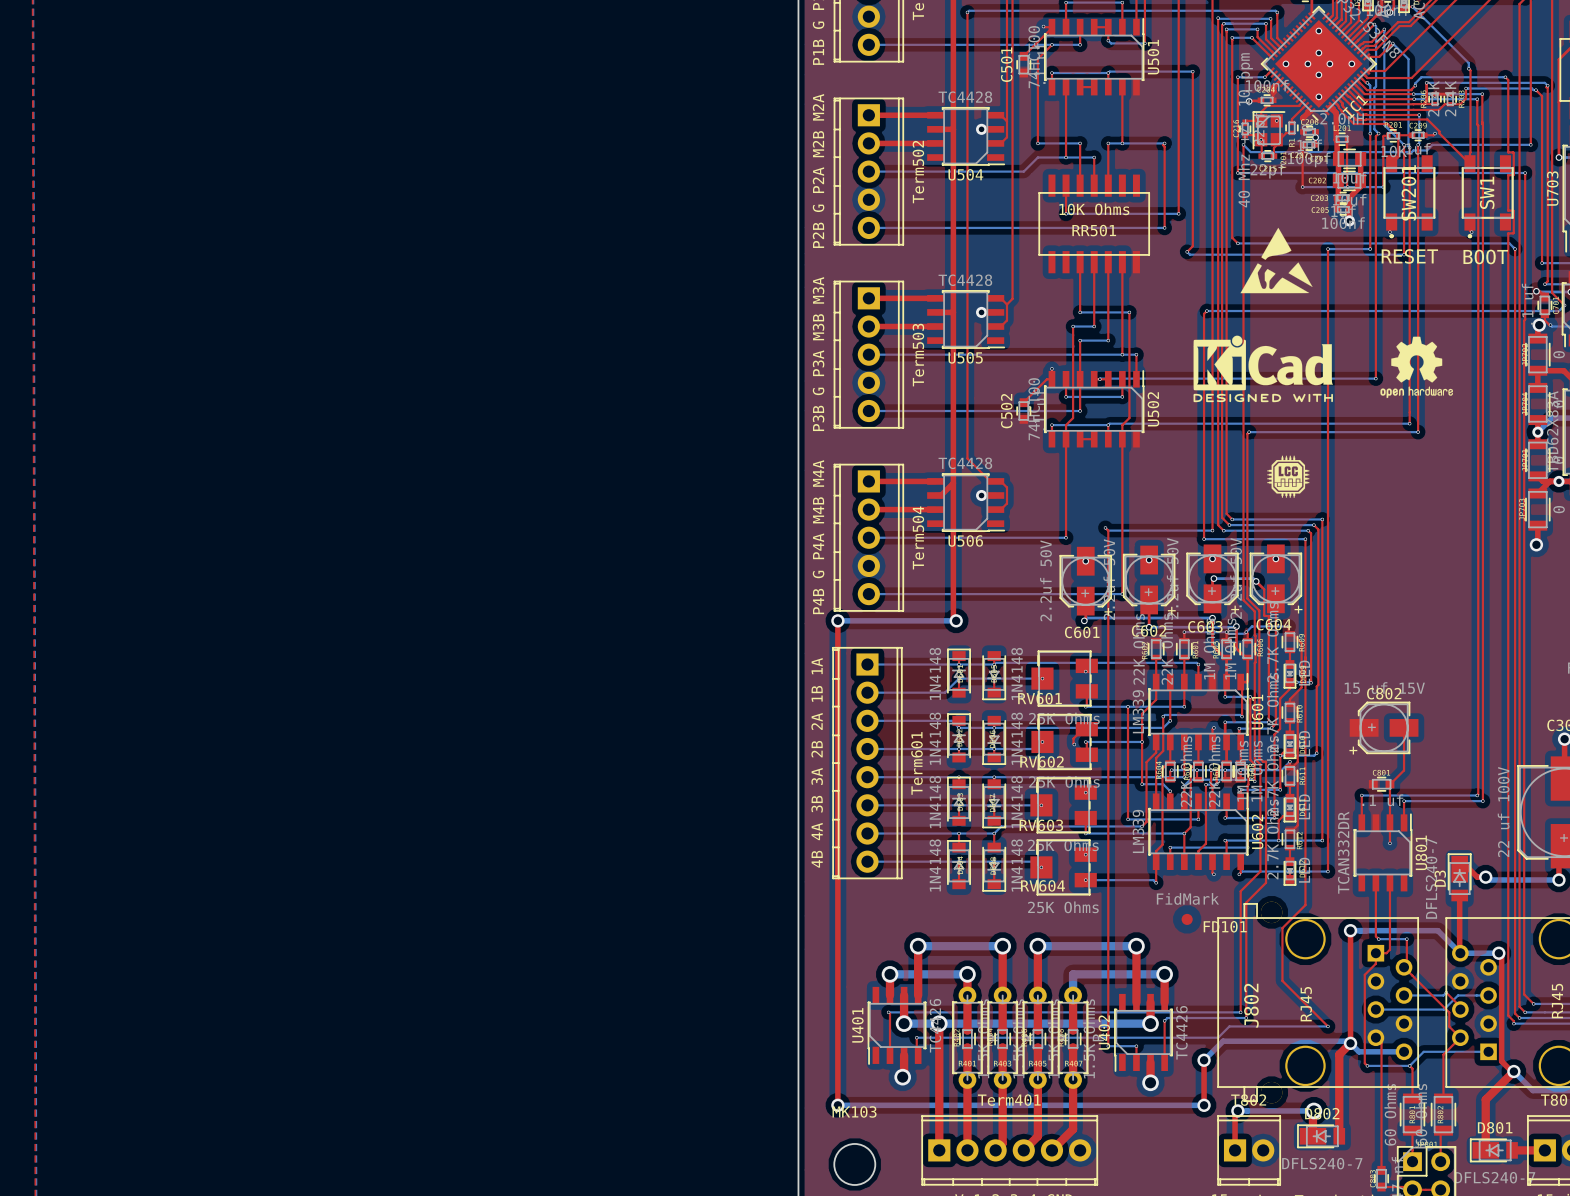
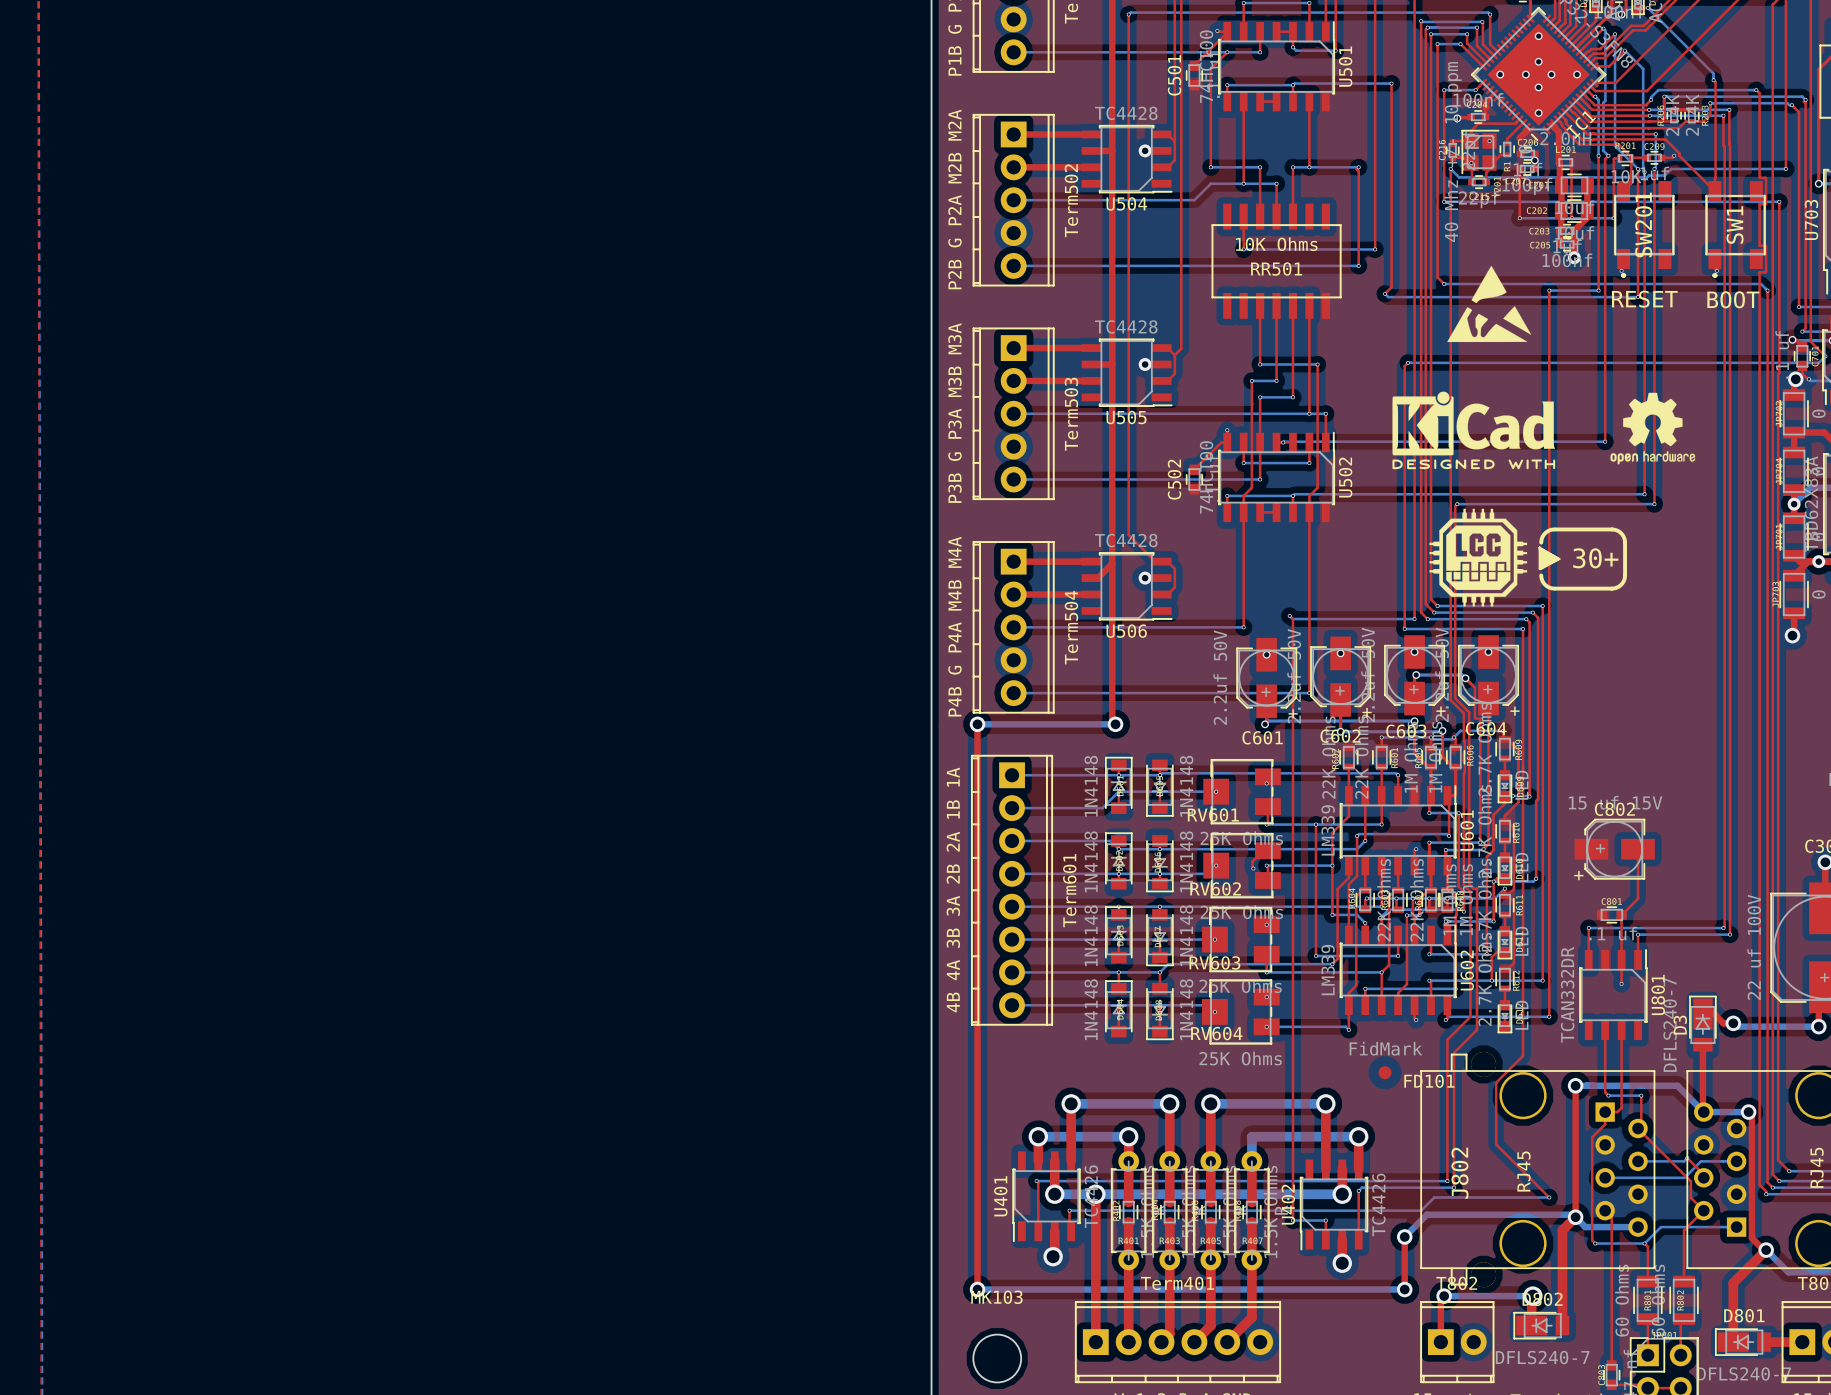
drawing: none -> [1429, 508, 1627, 607]
drawing: [1267, 455, 1310, 498] -> none

